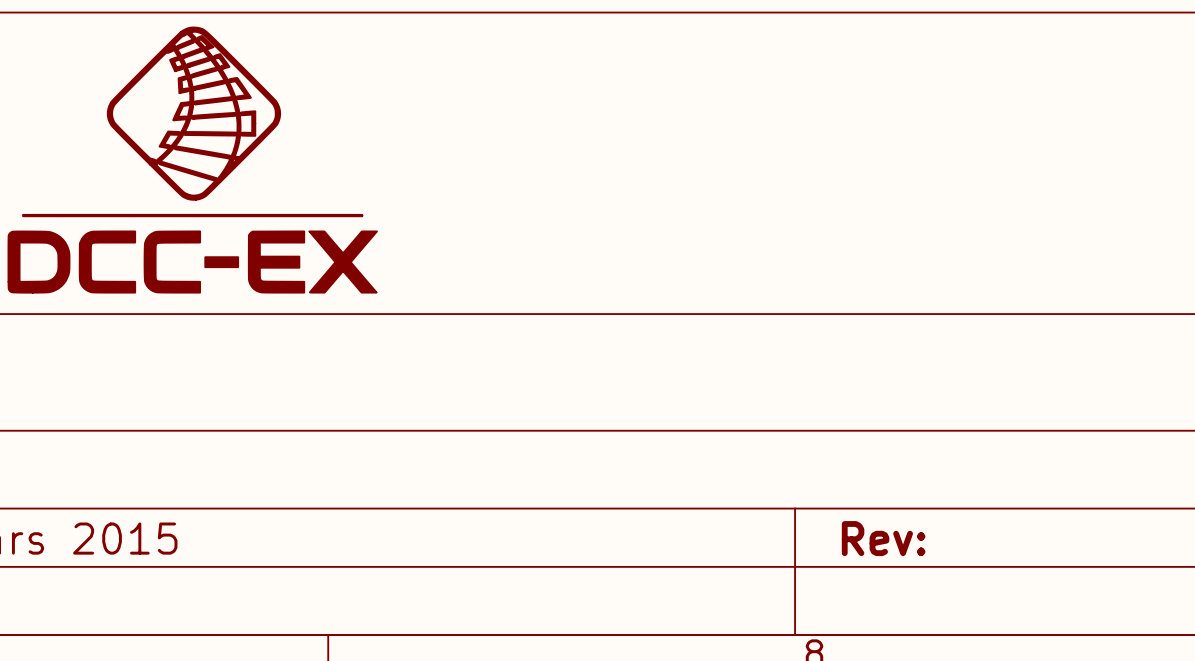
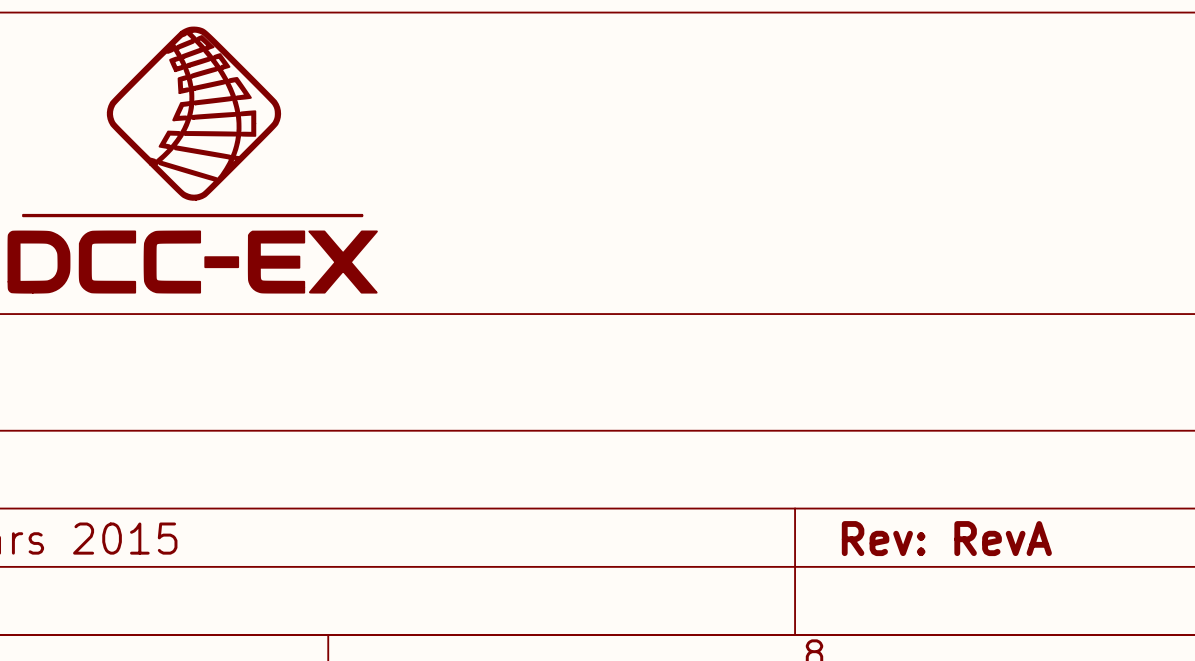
title block: Rev: (883, 538) -> Rev: RevA (946, 538)

